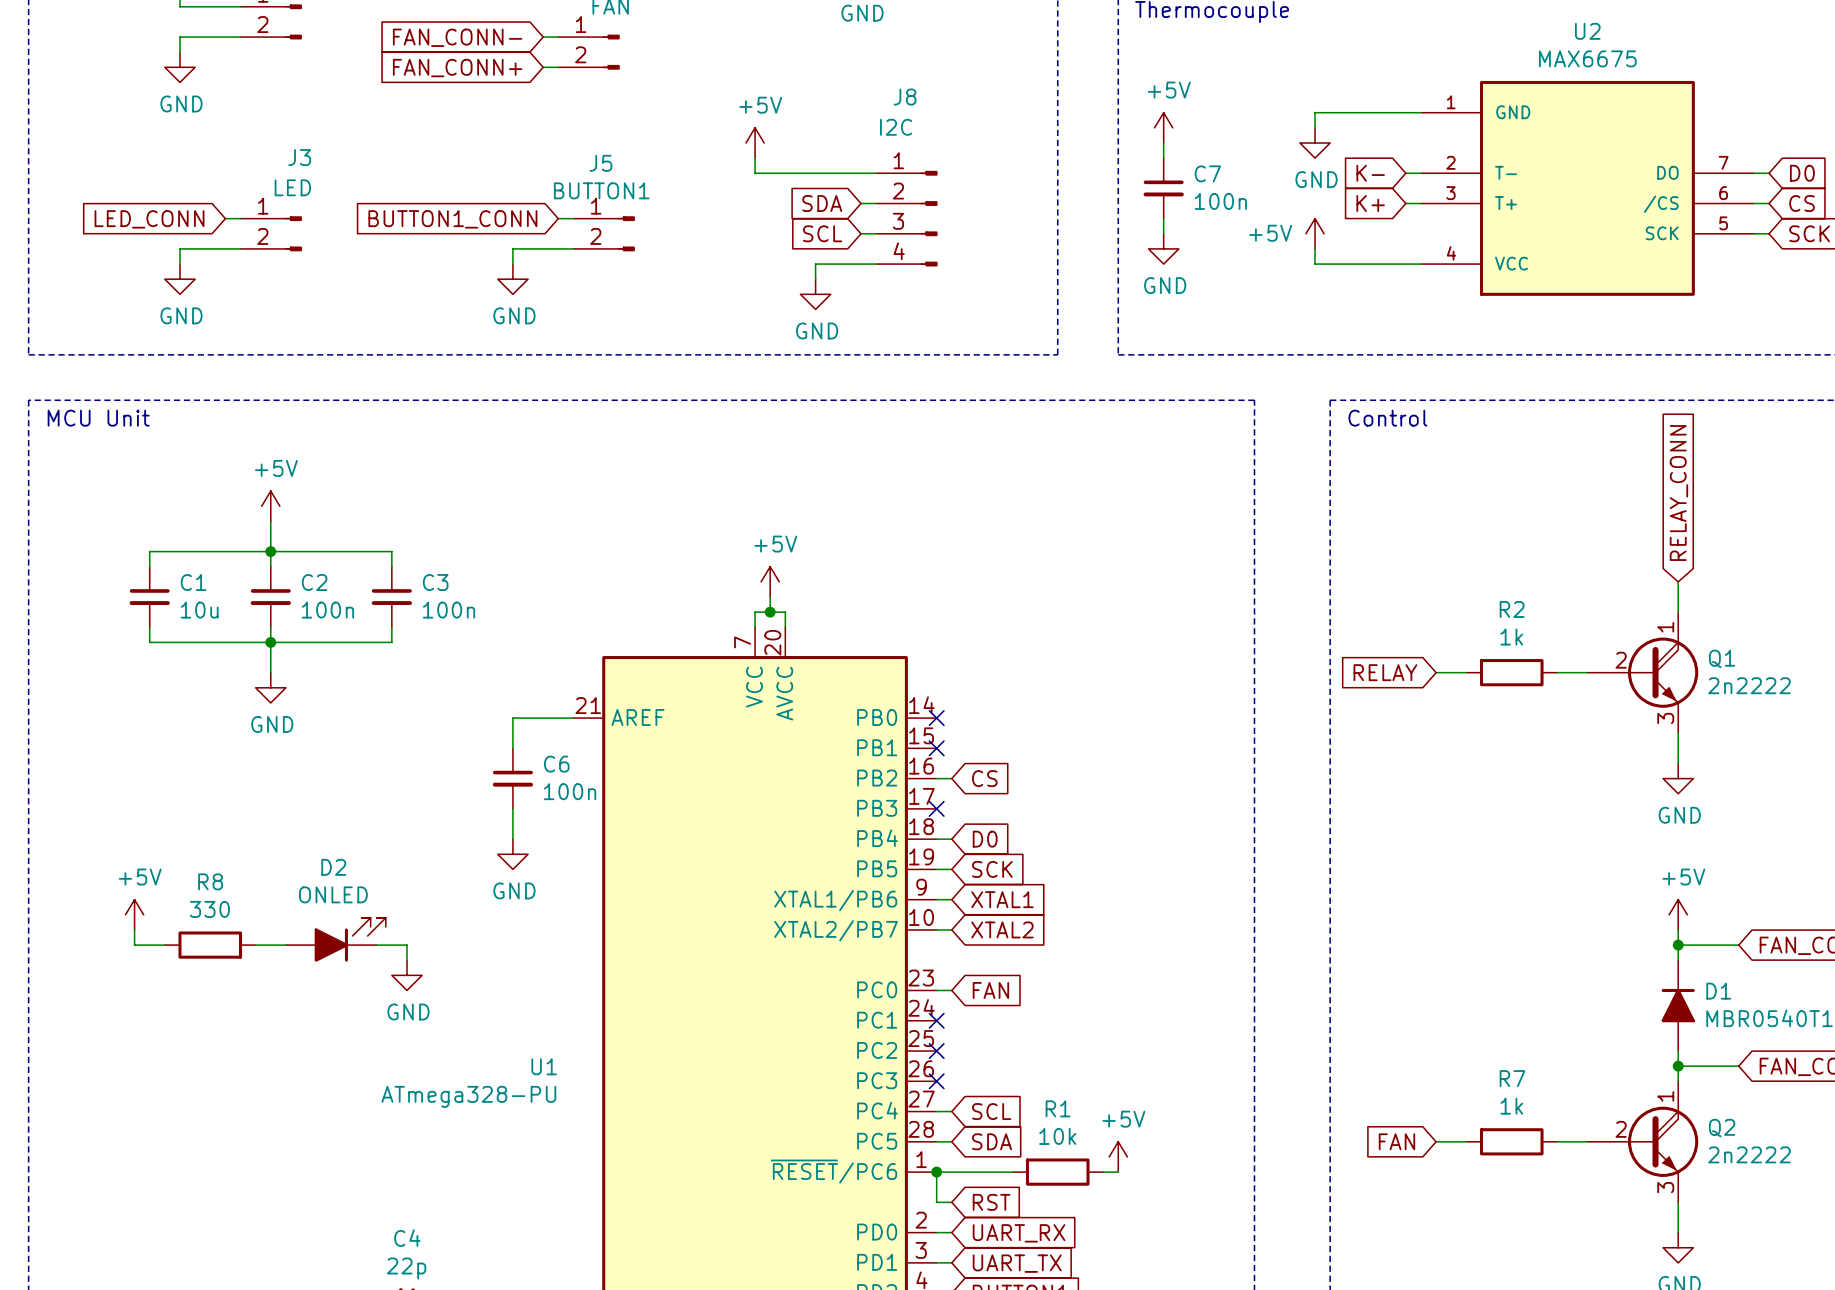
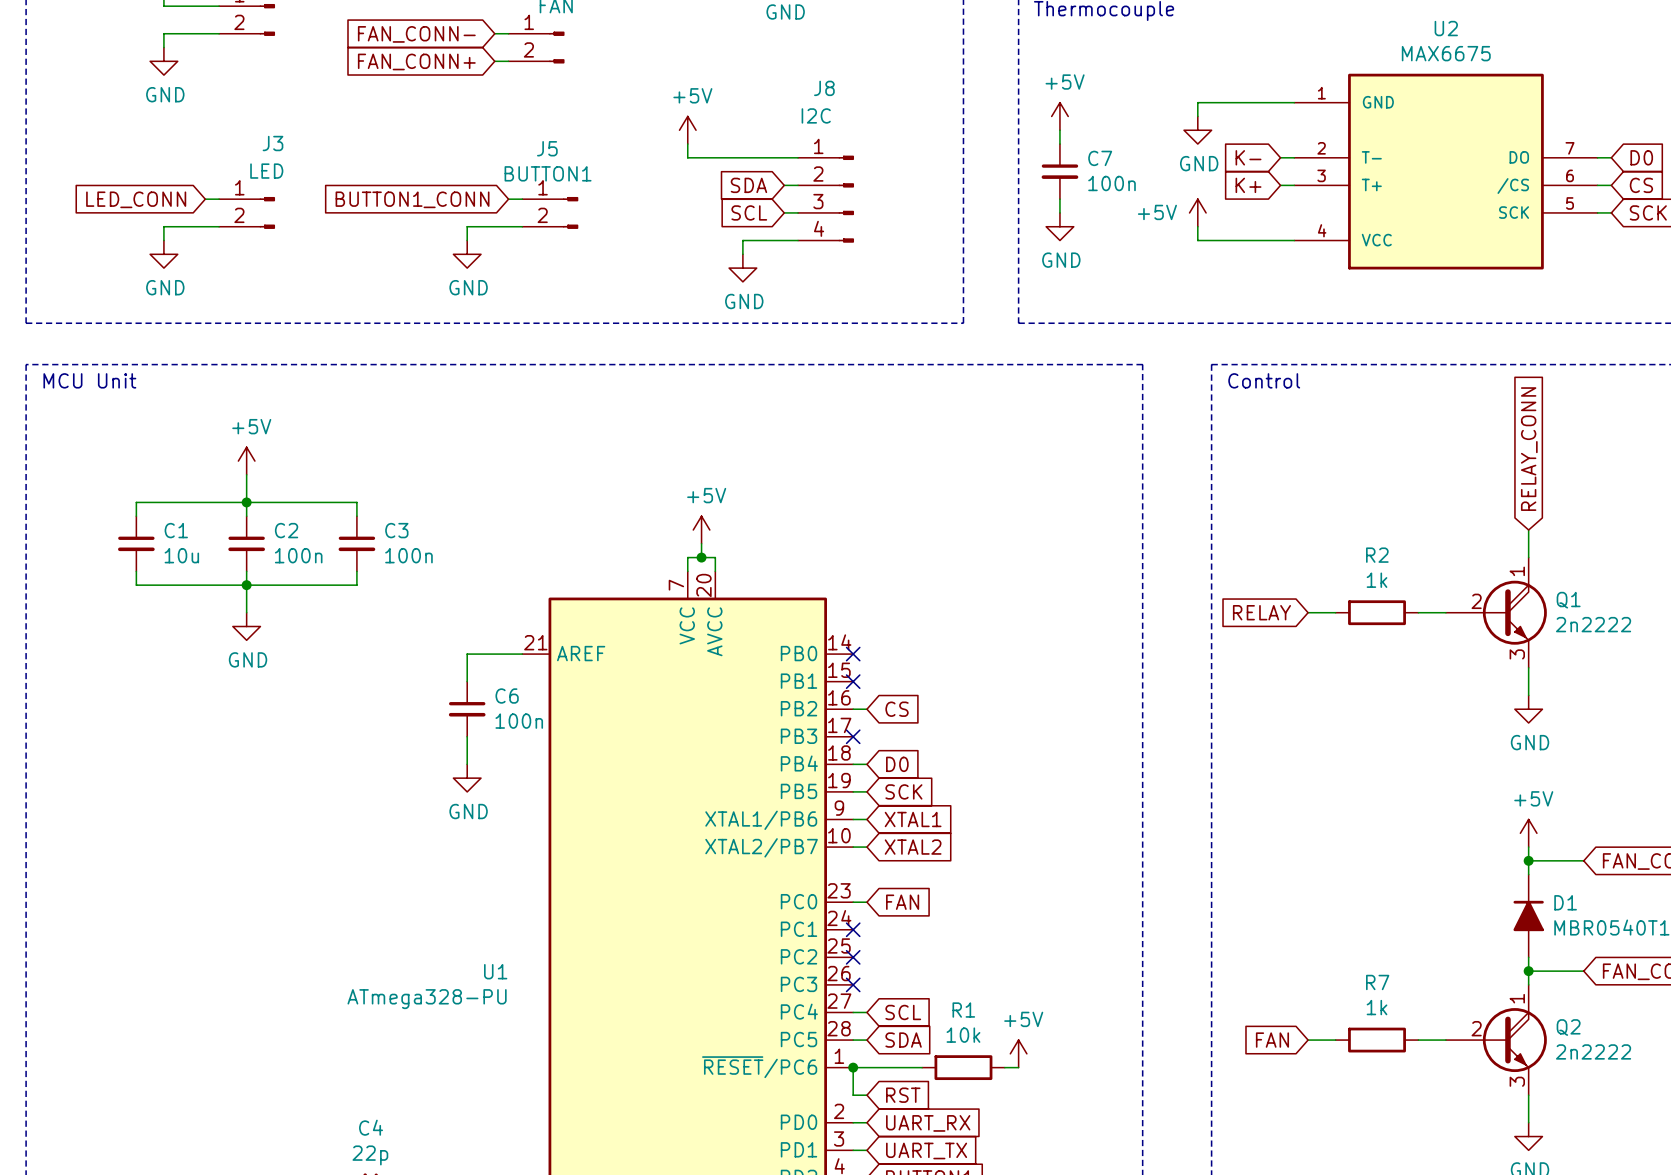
power symbol: +5V (134, 914) -> none
wire: (134, 929) (134, 945) (164, 945) -> none
D2: ONLED (335, 939) -> none
R8: 330 (210, 945) -> none
wire: (255, 945) (285, 945) -> none
wire: (376, 945) (406, 945) (406, 960) -> none
power symbol: GND (406, 975) -> none

